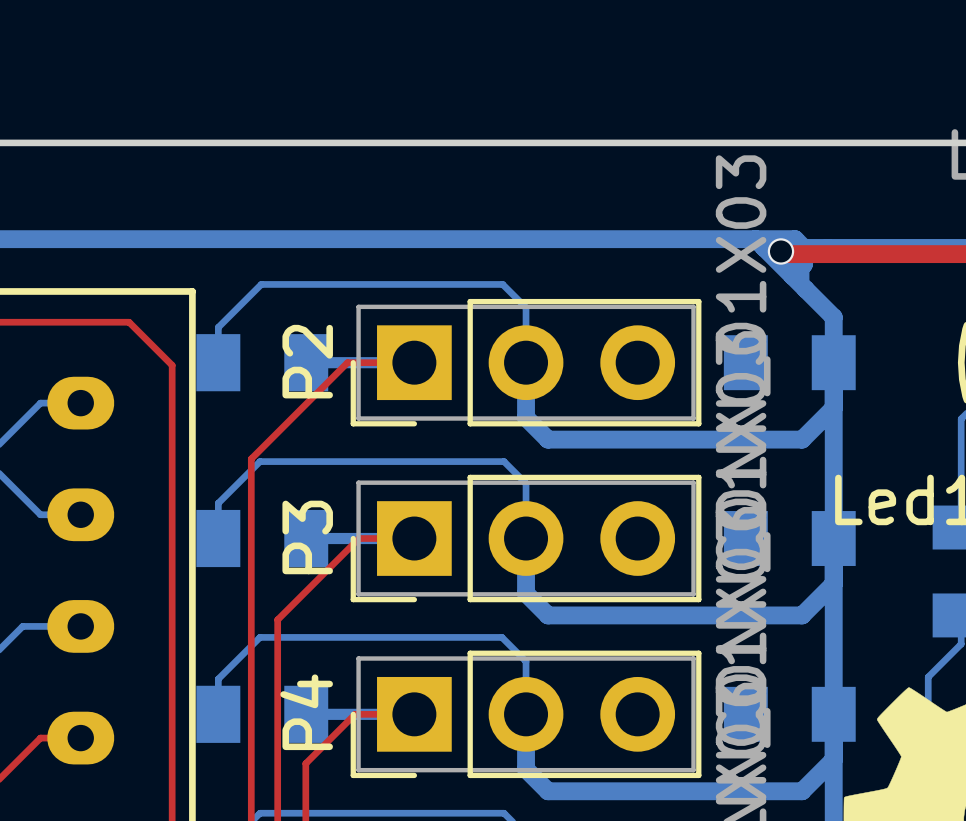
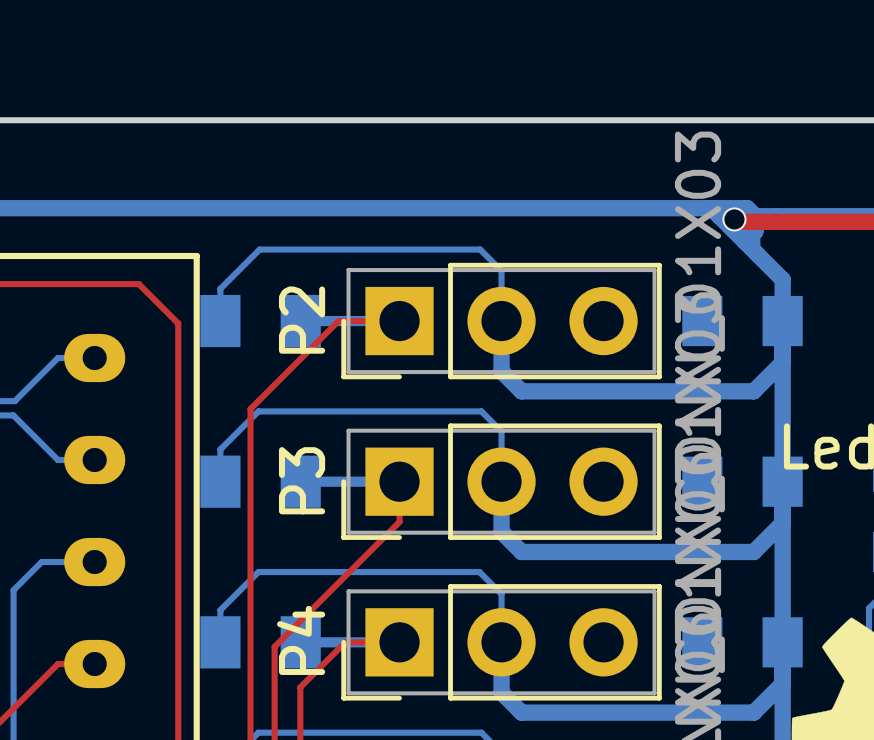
top track: (414, 538) (358, 538) (277, 619) (277, 719) -> (399, 481) (399, 521) (274, 646)

